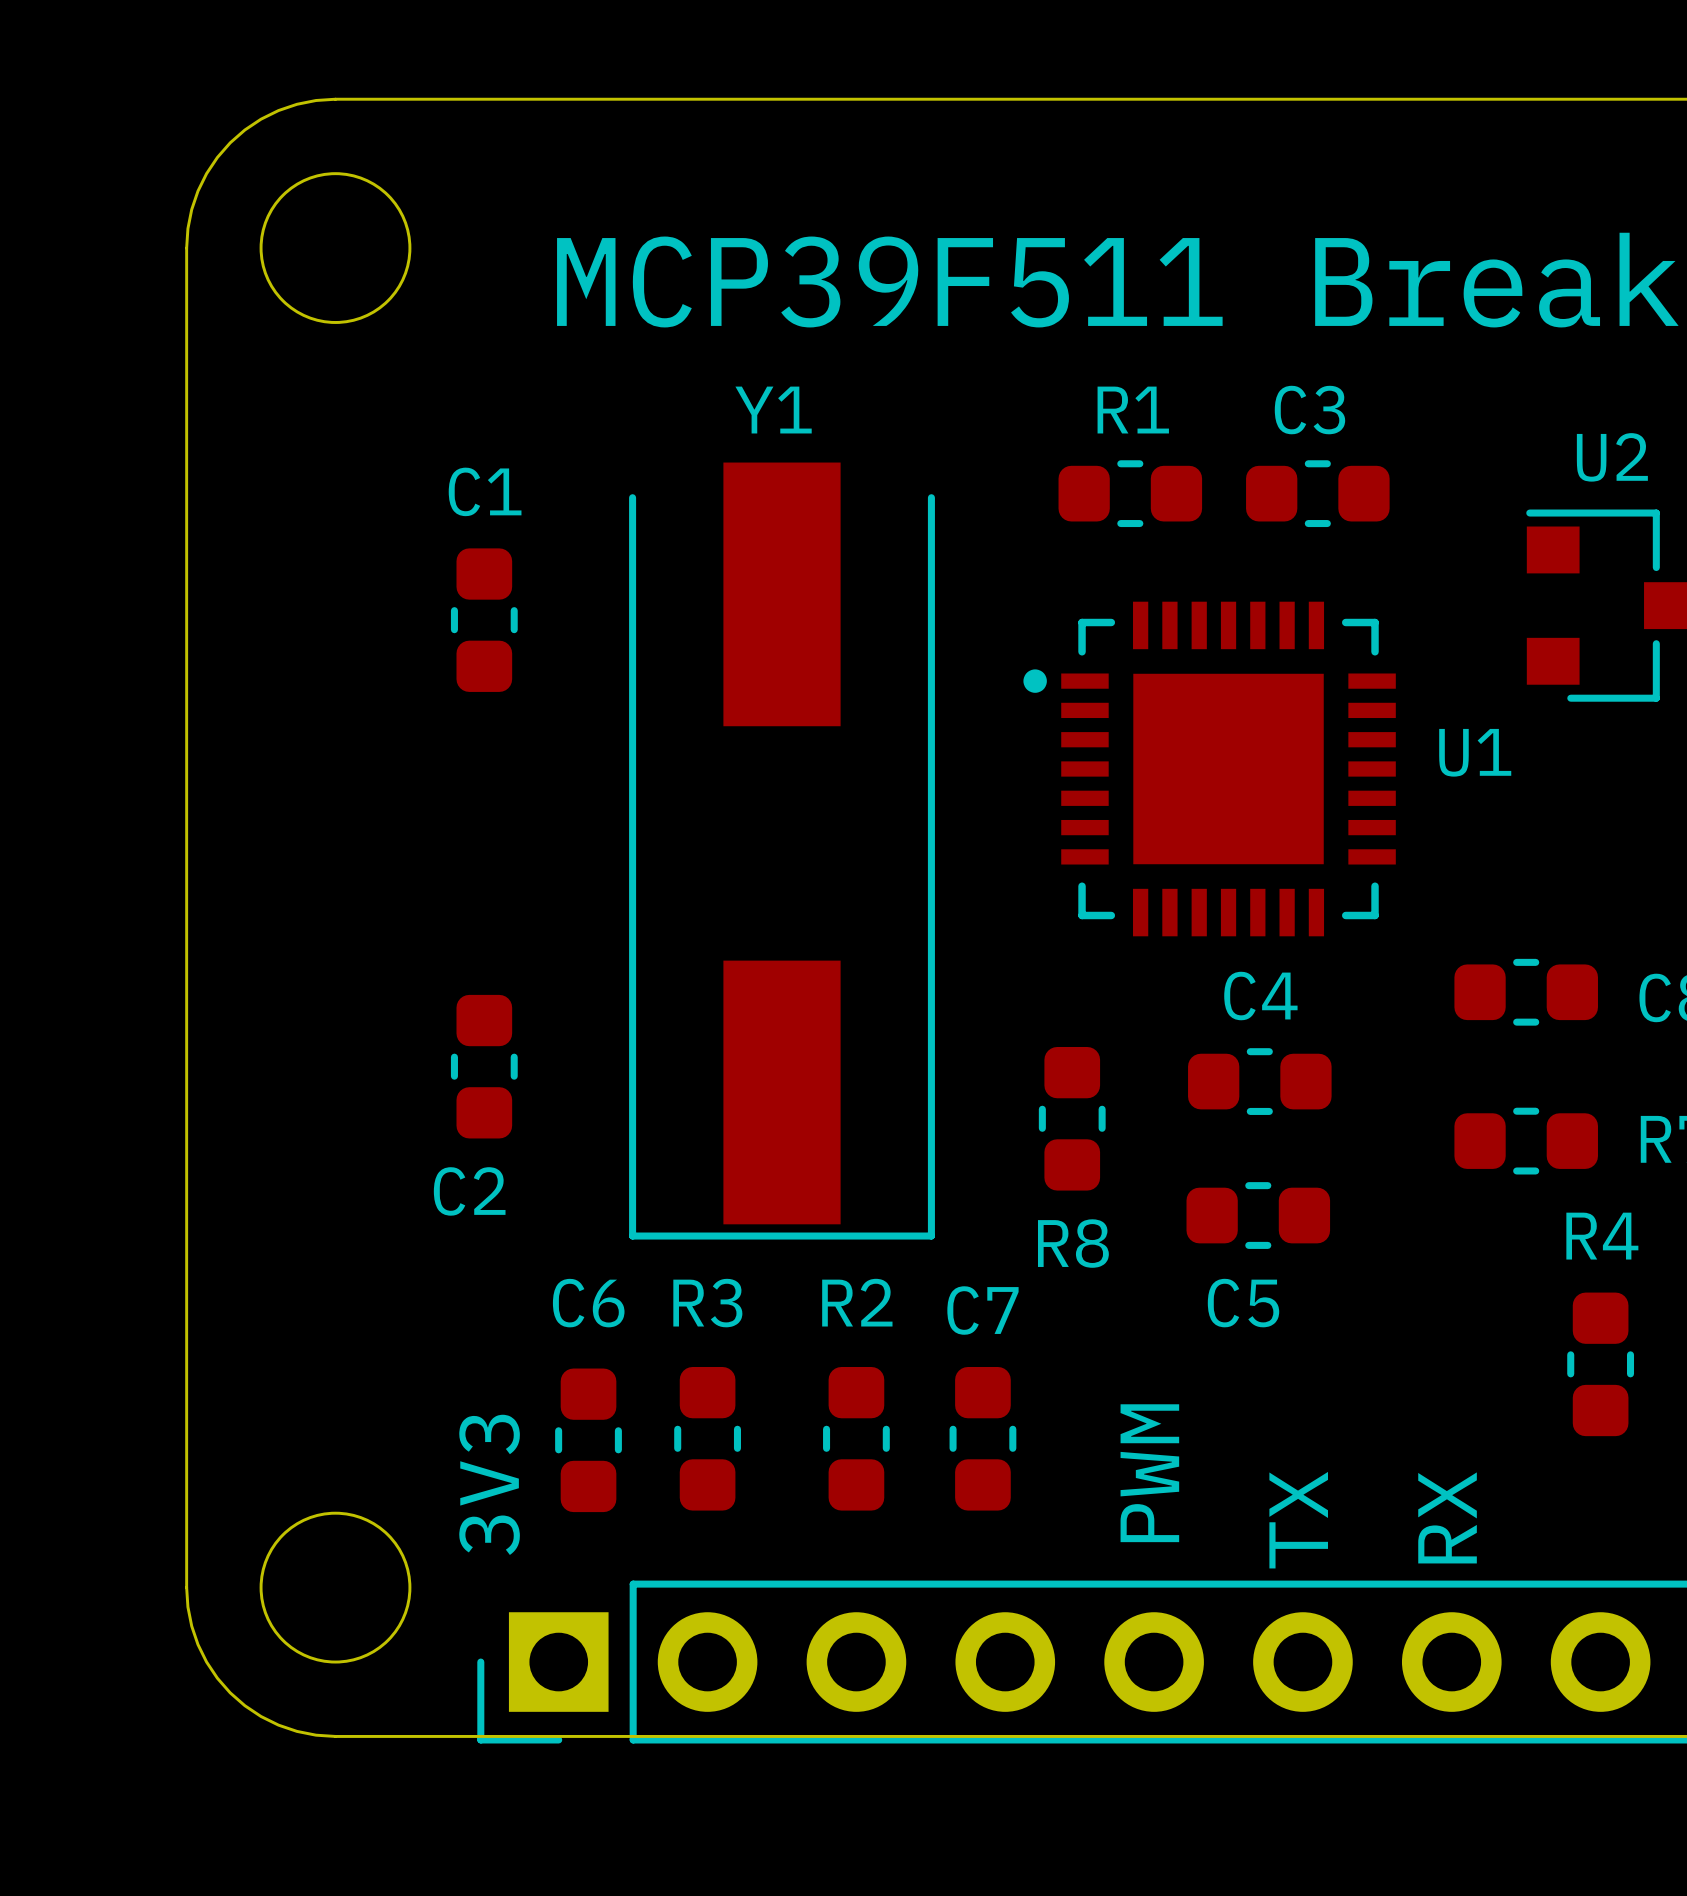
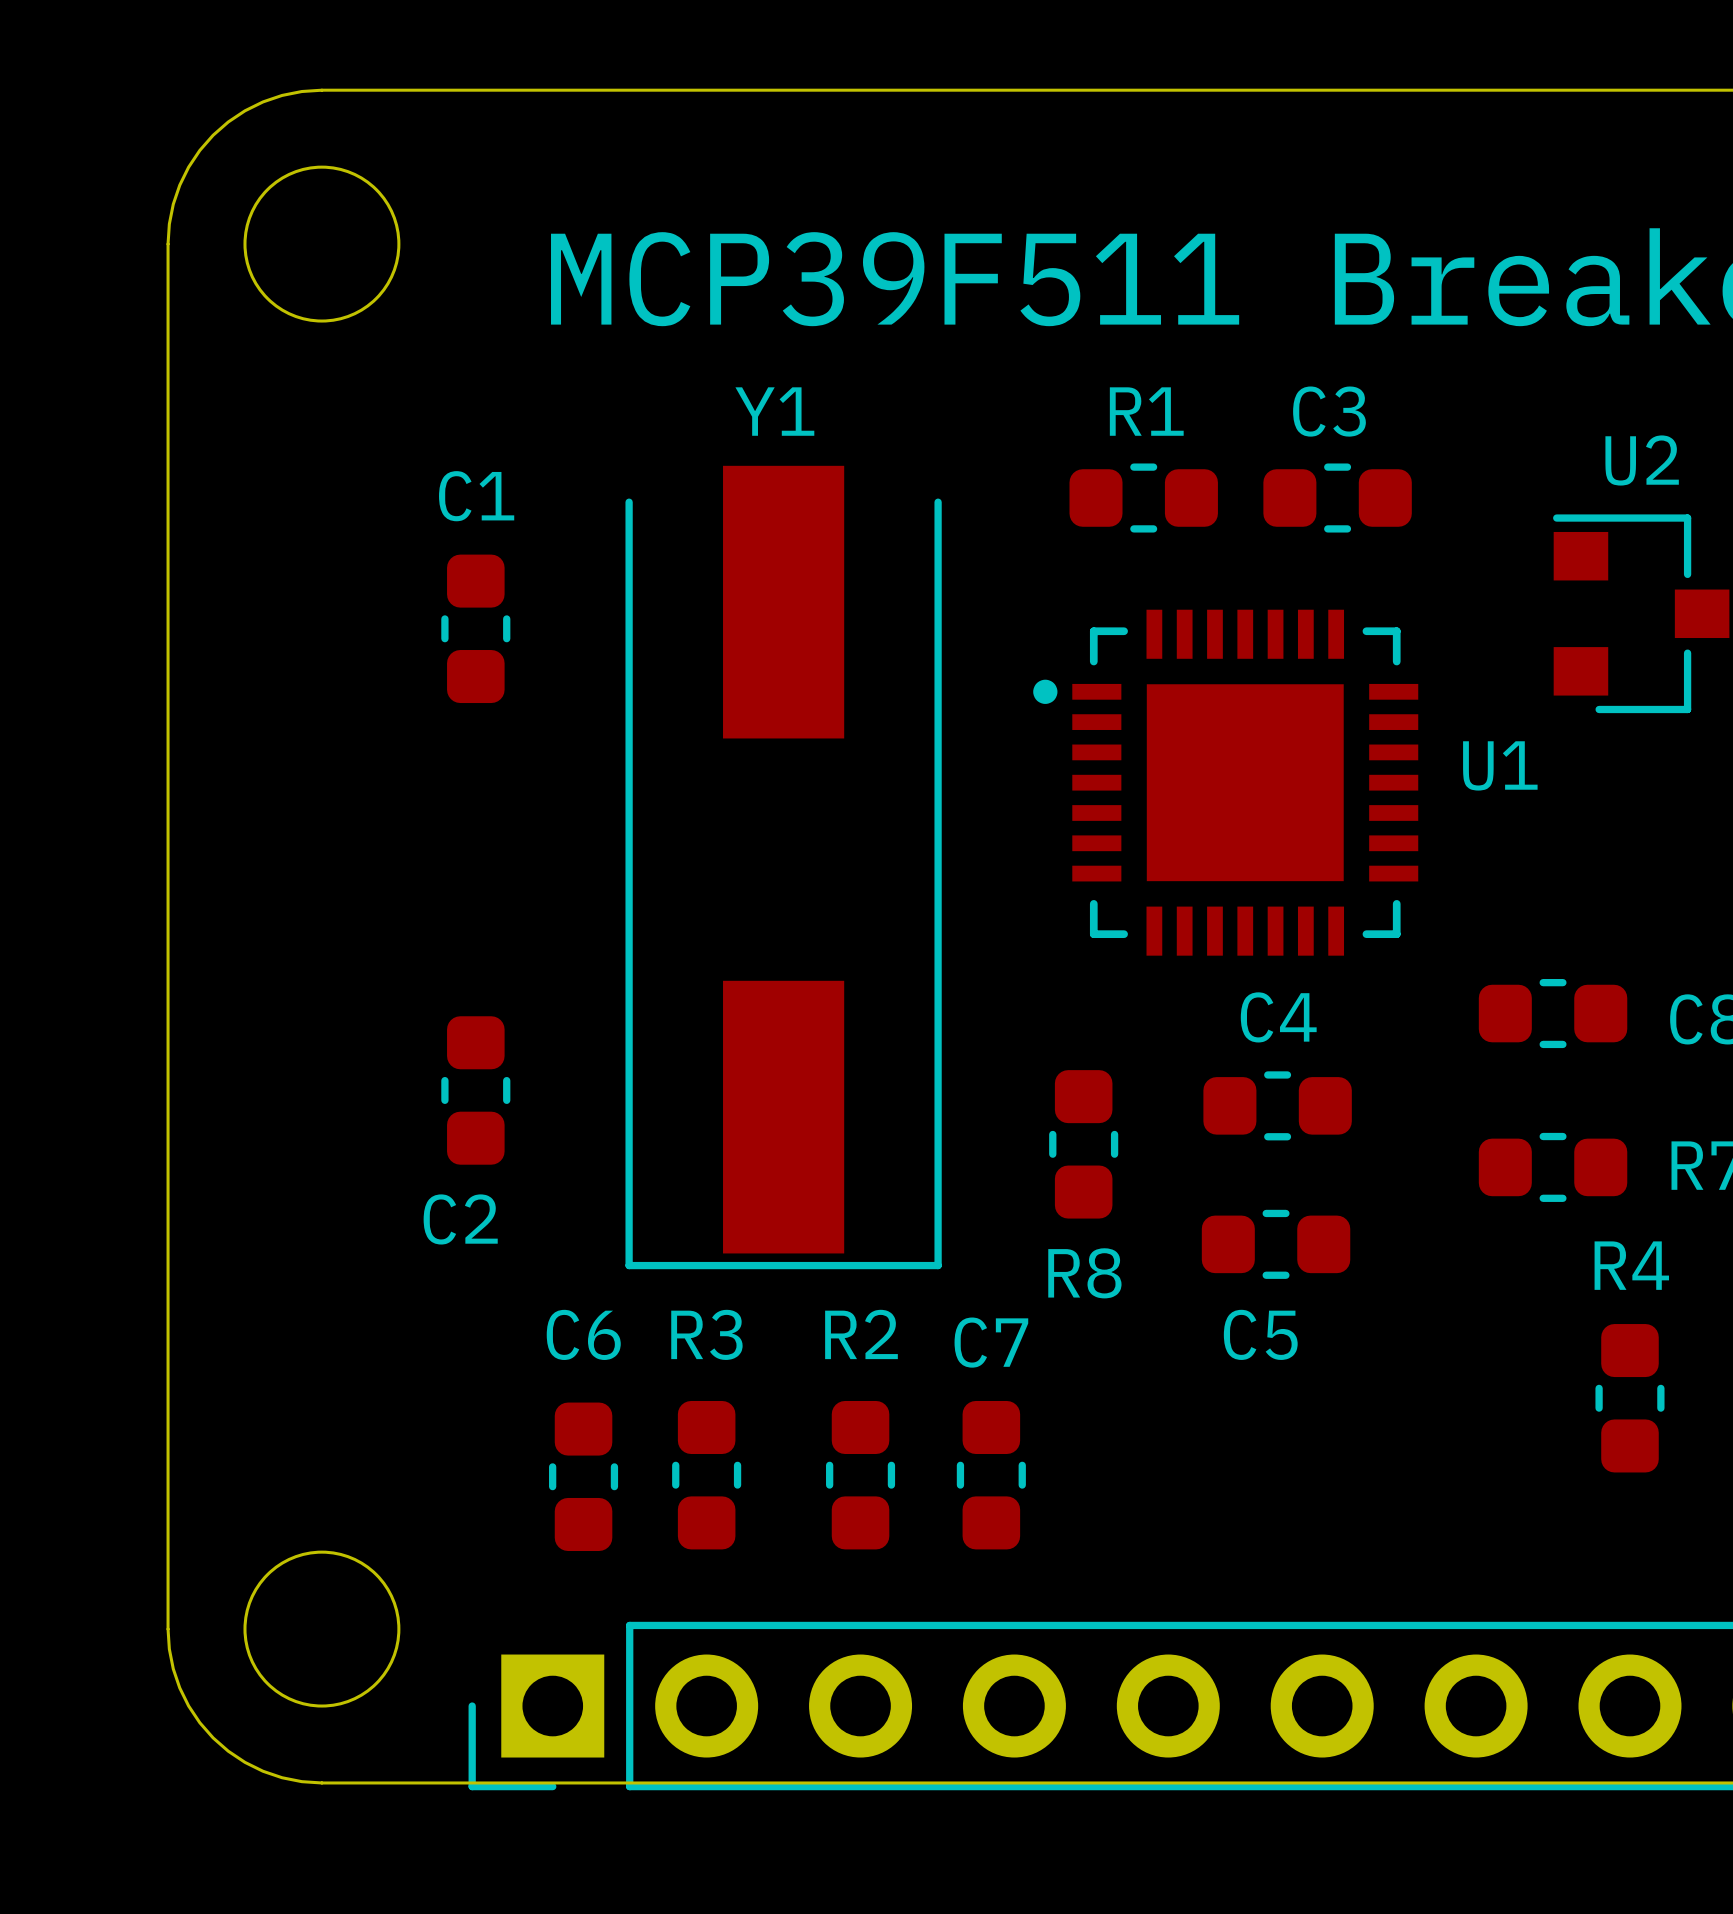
text: PWM (1149, 1473) -> none
text: 3V3 (489, 1484) -> none
text: RX (1447, 1517) -> none
text: TX (1298, 1520) -> none

